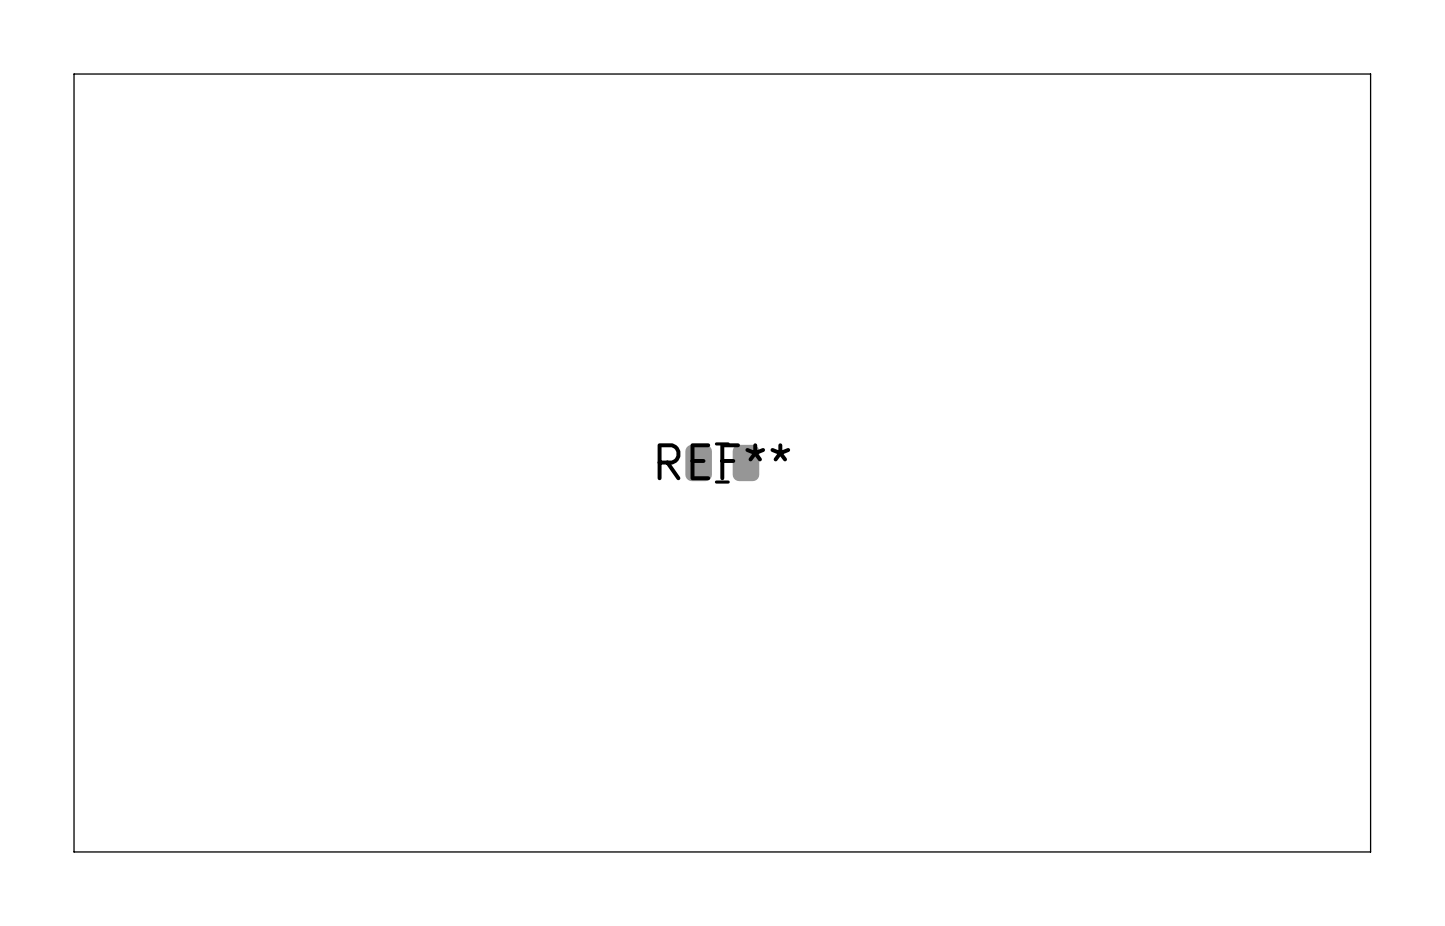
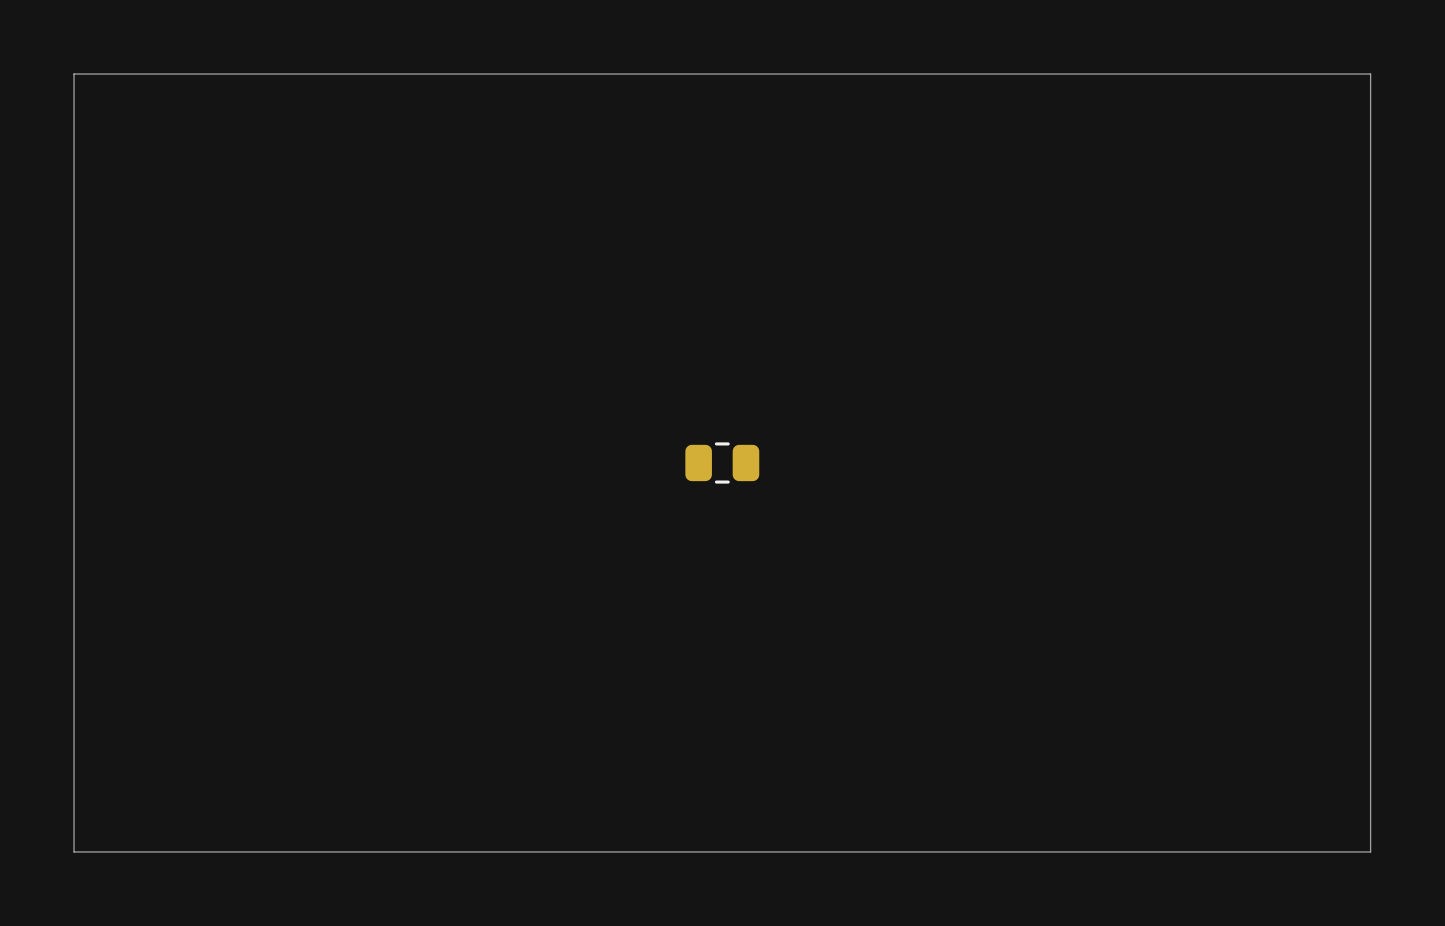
REF** name: REF** (723, 461) -> none

